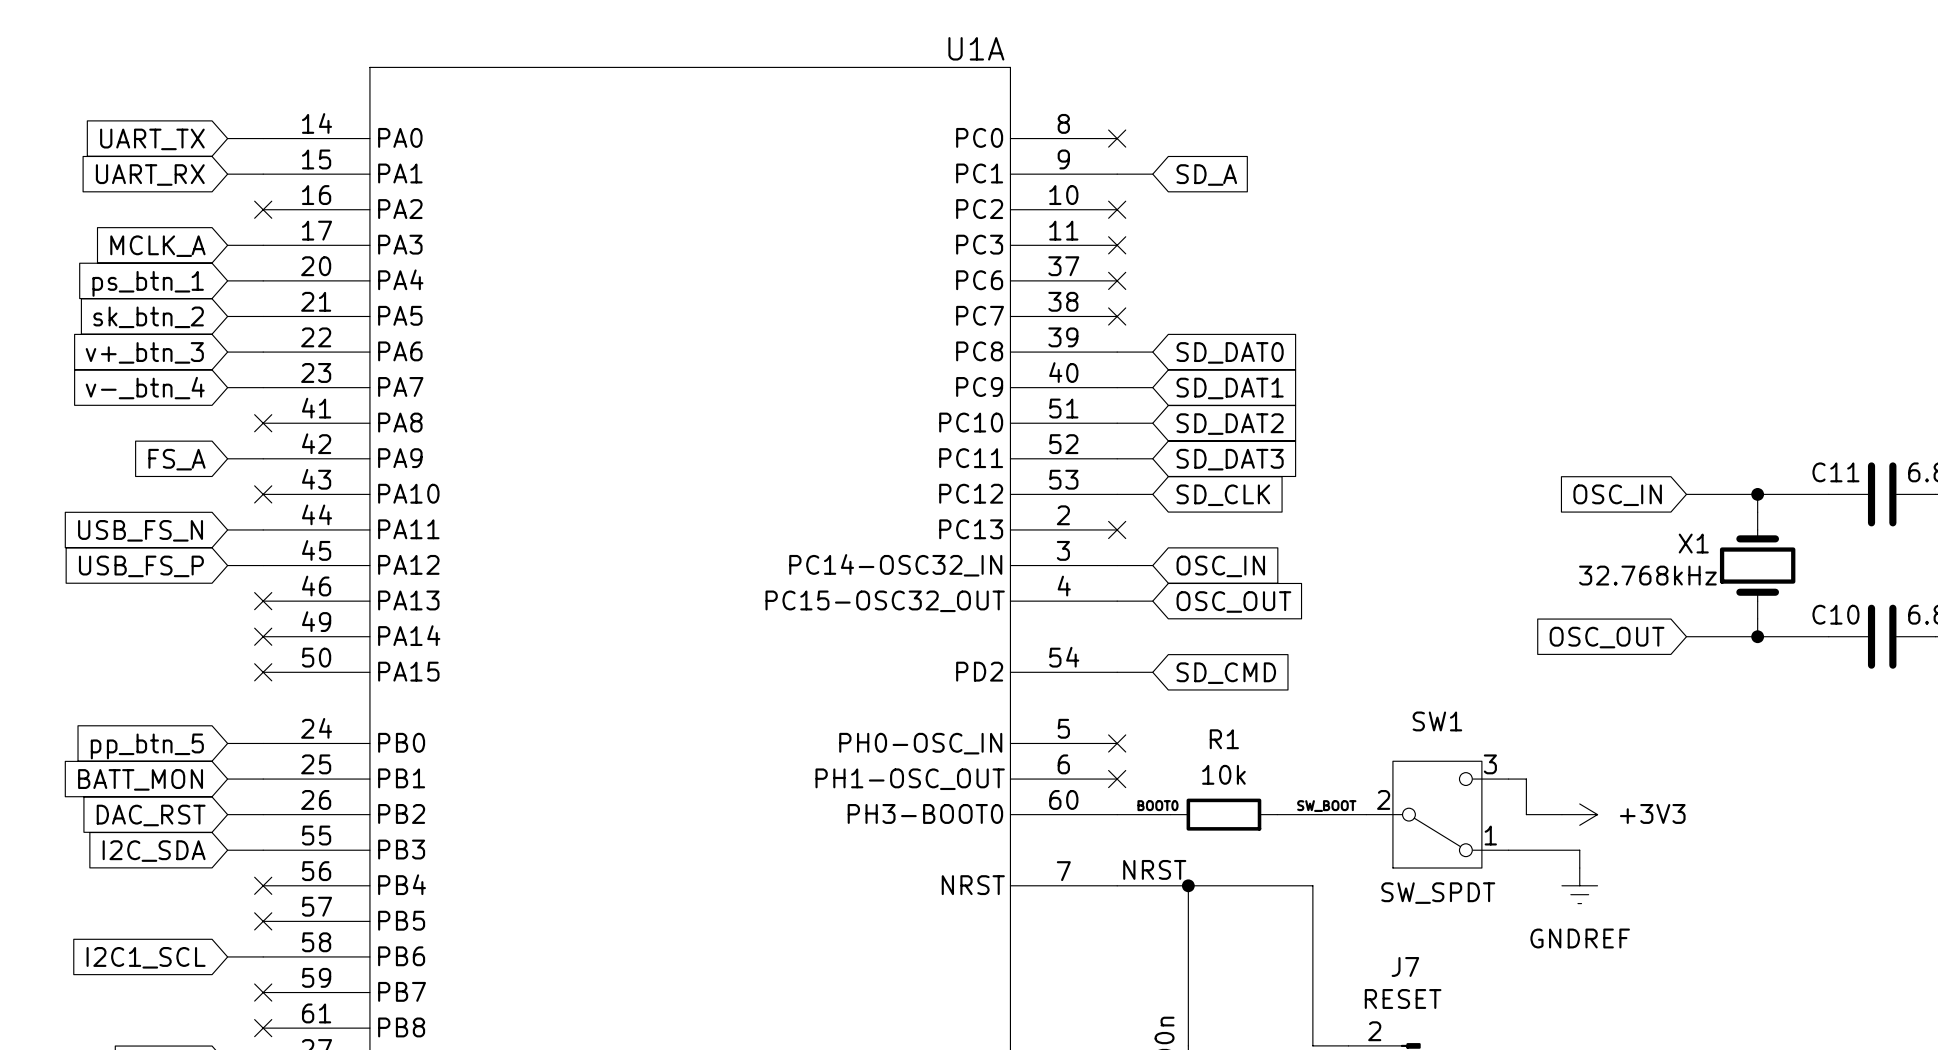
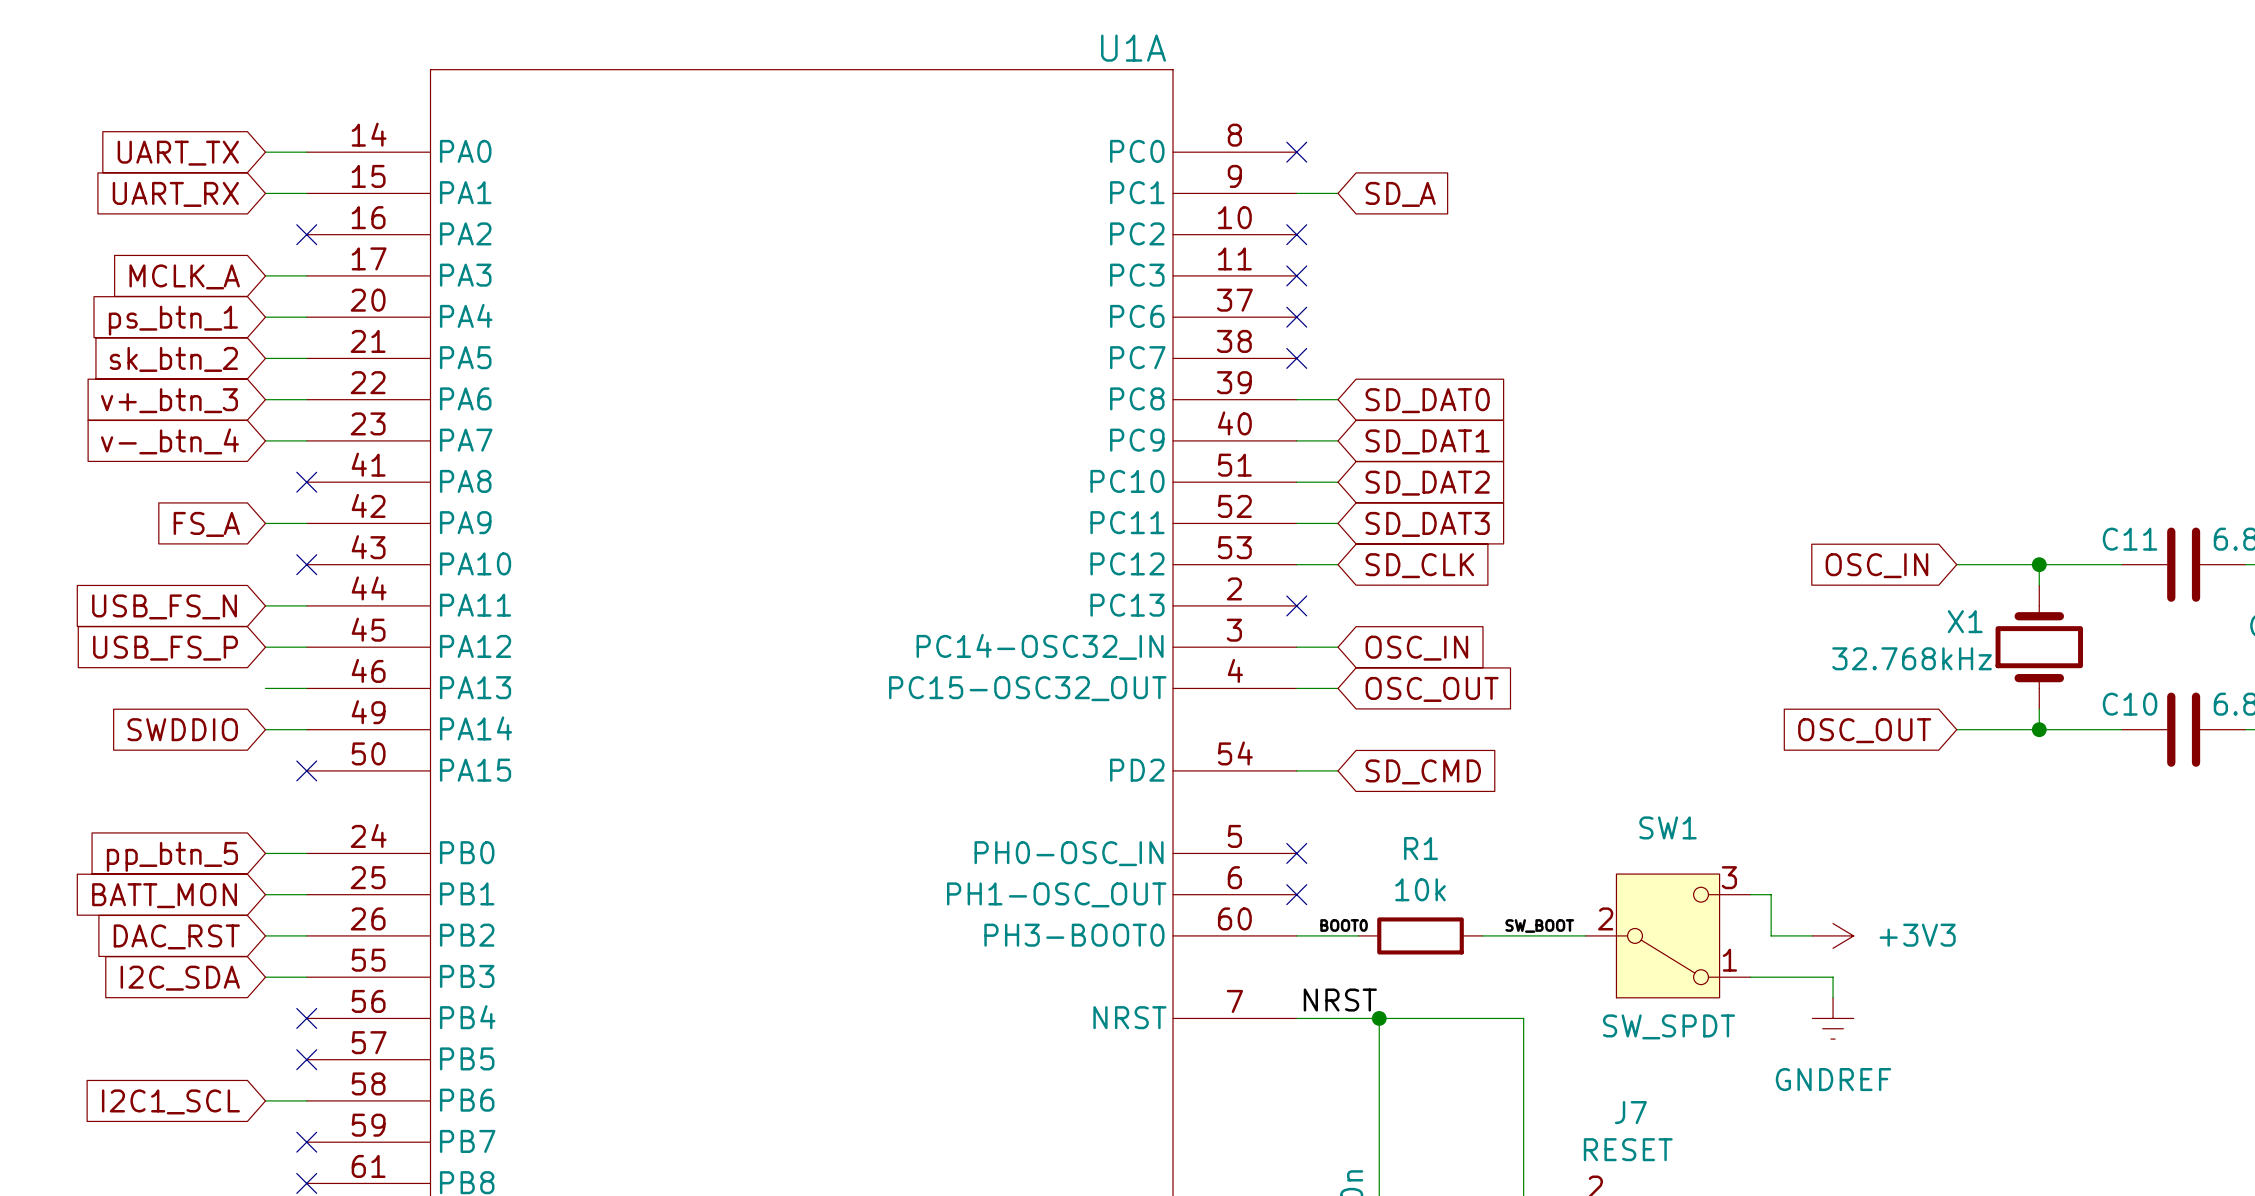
wire: none -> (265, 688) (306, 688)
no-connect mark: (263, 601) -> none
global label: none -> SWDDIO (182, 729)
wire: none -> (265, 729) (306, 729)
no-connect mark: (263, 636) -> none

